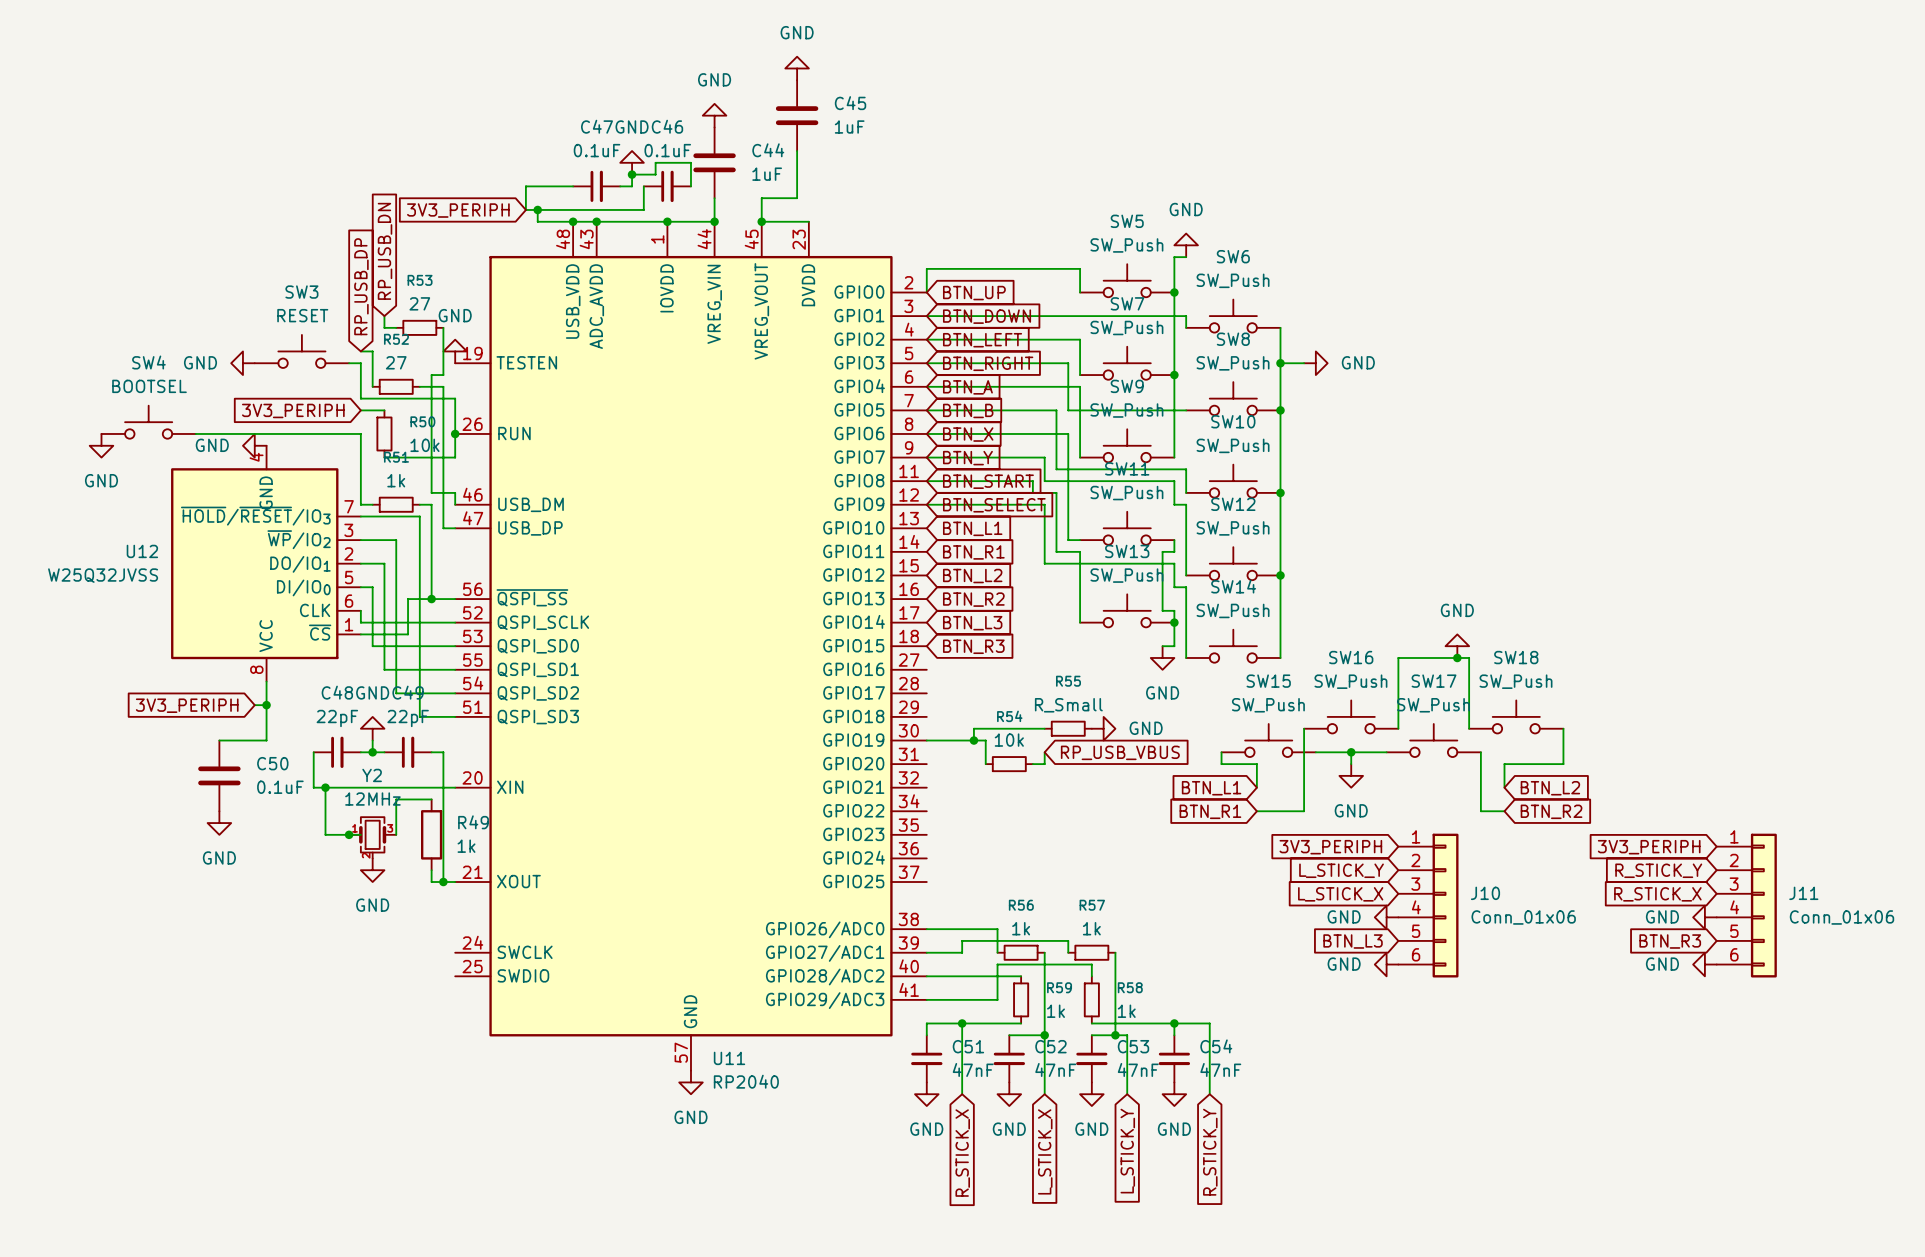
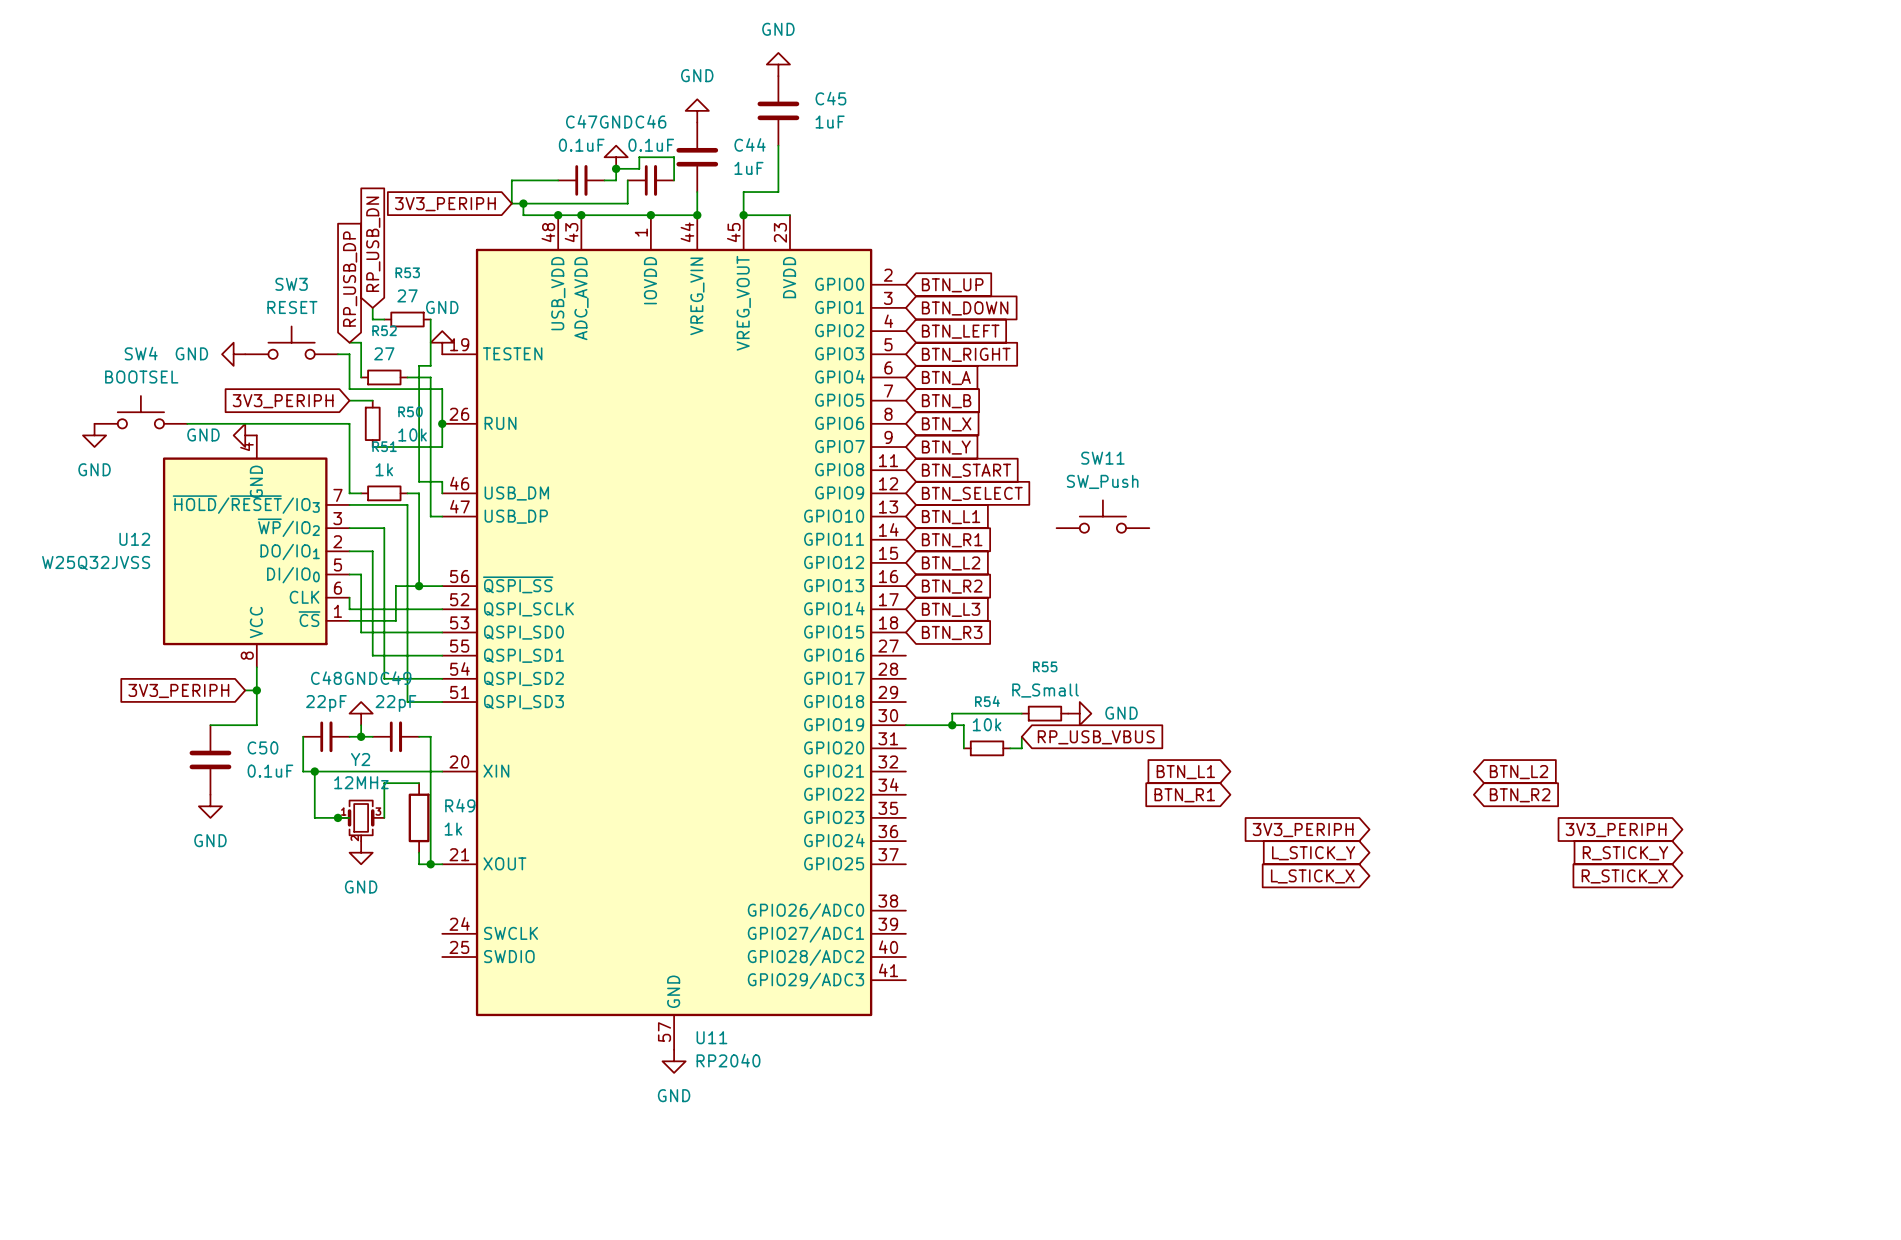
power symbol: GND (1186, 245) -> none
wire: (1186, 257) (1174, 257) (1174, 457) -> none
SW5: SW_Push (1127, 280) -> none
wire: (926, 292) (926, 268) (1080, 268) (1080, 292) -> none
junction: (1174, 292) -> none
wire: (926, 316) (1186, 316) (1186, 327) -> none
SW6: SW_Push (1233, 316) -> none
wire: (1280, 327) (1280, 657) -> none
wire: (926, 339) (1080, 339) (1080, 375) -> none
wire: (926, 363) (1068, 363) (1068, 410) (1186, 410) -> none
SW7: SW_Push (1127, 363) -> none
wire: (1280, 363) (1304, 363) -> none
junction: (1280, 363) -> none
power symbol: GND (1315, 363) -> none
junction: (1174, 375) -> none
wire: (926, 386) (1080, 386) (1080, 457) -> none
SW8: SW_Push (1233, 398) -> none
wire: (926, 410) (1056, 410) (1056, 469) (1186, 469) (1186, 492) -> none
junction: (1280, 410) -> none
wire: (926, 433) (1068, 433) (1068, 540) (1080, 540) -> none
SW9: SW_Push (1127, 445) -> none
wire: (926, 457) (1044, 457) (1044, 481) (1174, 481) (1174, 504) (1186, 504) (1186, 575) -> none
wire: (926, 481) (1032, 481) (1032, 492) (1056, 492) (1056, 551) (1080, 551) (1080, 622) -> none
SW10: SW_Push (1233, 481) -> none
junction: (1280, 492) -> none
wire: (926, 504) (1044, 504) (1044, 563) (1174, 563) (1174, 587) (1186, 587) (1186, 657) -> none
wire: (1174, 540) (1174, 551) (1162, 551) (1162, 610) (1174, 610) (1174, 646) (1162, 646) -> none
SW12: SW_Push (1233, 563) -> none
junction: (1280, 575) -> none
SW13: SW_Push (1127, 610) -> none
junction: (1174, 622) -> none
SW14: SW_Push (1233, 646) -> none
power symbol: GND (1457, 646) -> none
power symbol: GND (1162, 657) -> none
junction: (1457, 657) -> none
SW16: SW_Push (1351, 716) -> none
SW18: SW_Push (1516, 716) -> none
wire: (1304, 728) (1304, 811) (1256, 811) -> none
wire: (1398, 728) (1398, 657) (1469, 657) (1469, 728) -> none
wire: (1563, 728) (1563, 764) (1504, 764) (1504, 787) -> none
SW15: SW_Push (1268, 740) -> none
SW17: SW_Push (1433, 740) -> none
wire: (1221, 752) (1221, 764) (1256, 764) (1256, 787) -> none
wire: (1315, 752) (1386, 752) -> none
wire: (1351, 752) (1351, 764) -> none
junction: (1351, 752) -> none
wire: (1480, 752) (1480, 811) (1504, 811) -> none
power symbol: GND (1351, 775) -> none
J10: Conn_01x06 (1428, 905) -> none
J11: Conn_01x06 (1746, 905) -> none
power symbol: GND (1386, 917) -> none
power symbol: GND (1704, 917) -> none
wire: (926, 929) (997, 929) (997, 952) -> none
global label: BTN_L3 (1353, 941) -> none
global label: BTN_R3 (1670, 941) -> none
wire: (926, 952) (962, 952) (962, 940) (1068, 940) (1068, 952) -> none
R56: 1k (1021, 952) -> none
wire: (1044, 952) (1044, 1094) -> none
R57: 1k (1091, 952) -> none
wire: (1115, 952) (1115, 1035) -> none
power symbol: GND (1386, 964) -> none
power symbol: GND (1704, 964) -> none
wire: (926, 976) (1021, 976) -> none
wire: (1091, 976) (1091, 964) (997, 964) (997, 999) (926, 999) -> none
R59: 1k (1021, 999) -> none
R58: 1k (1091, 999) -> none
wire: (962, 1023) (962, 1094) -> none
junction: (962, 1023) -> none
wire: (1021, 1023) (926, 1023) (926, 1035) -> none
wire: (1091, 1023) (1209, 1023) (1209, 1094) -> none
wire: (1174, 1023) (1174, 1035) -> none
junction: (1174, 1023) -> none
wire: (1009, 1035) (1044, 1035) -> none
junction: (1044, 1035) -> none
wire: (1091, 1035) (1127, 1035) (1127, 1094) -> none
junction: (1115, 1035) -> none
C51: 47nF (926, 1058) -> none
C52: 47nF (1009, 1058) -> none
C53: 47nF (1091, 1058) -> none
C54: 47nF (1174, 1058) -> none
power symbol: GND (926, 1094) -> none
power symbol: GND (1009, 1094) -> none
power symbol: GND (1091, 1094) -> none
power symbol: GND (1174, 1094) -> none
global label: L_STICK_X (1045, 1151) -> none
global label: L_STICK_Y (1127, 1151) -> none
global label: R_STICK_Y (1210, 1152) -> none
global label: R_STICK_X (962, 1153) -> none

